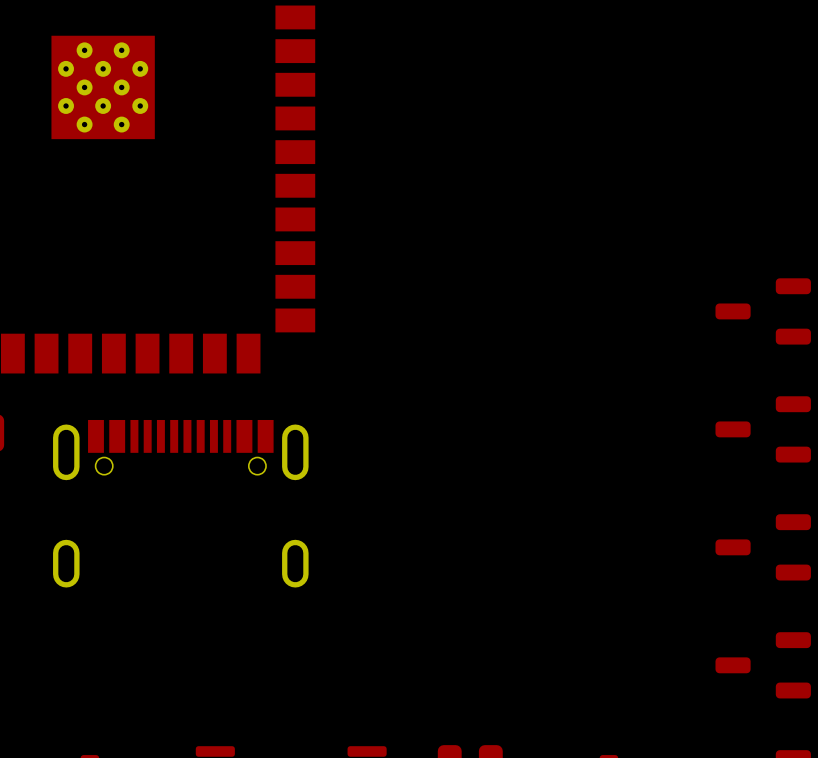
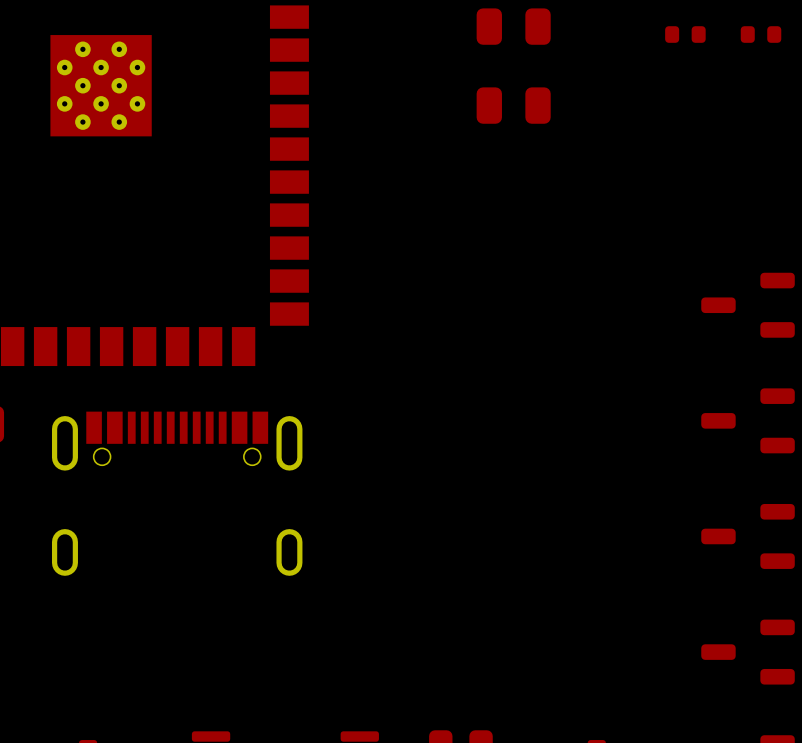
part: none -> (513, 26)
part: none -> (685, 34)
part: none -> (761, 34)
part: none -> (513, 105)

